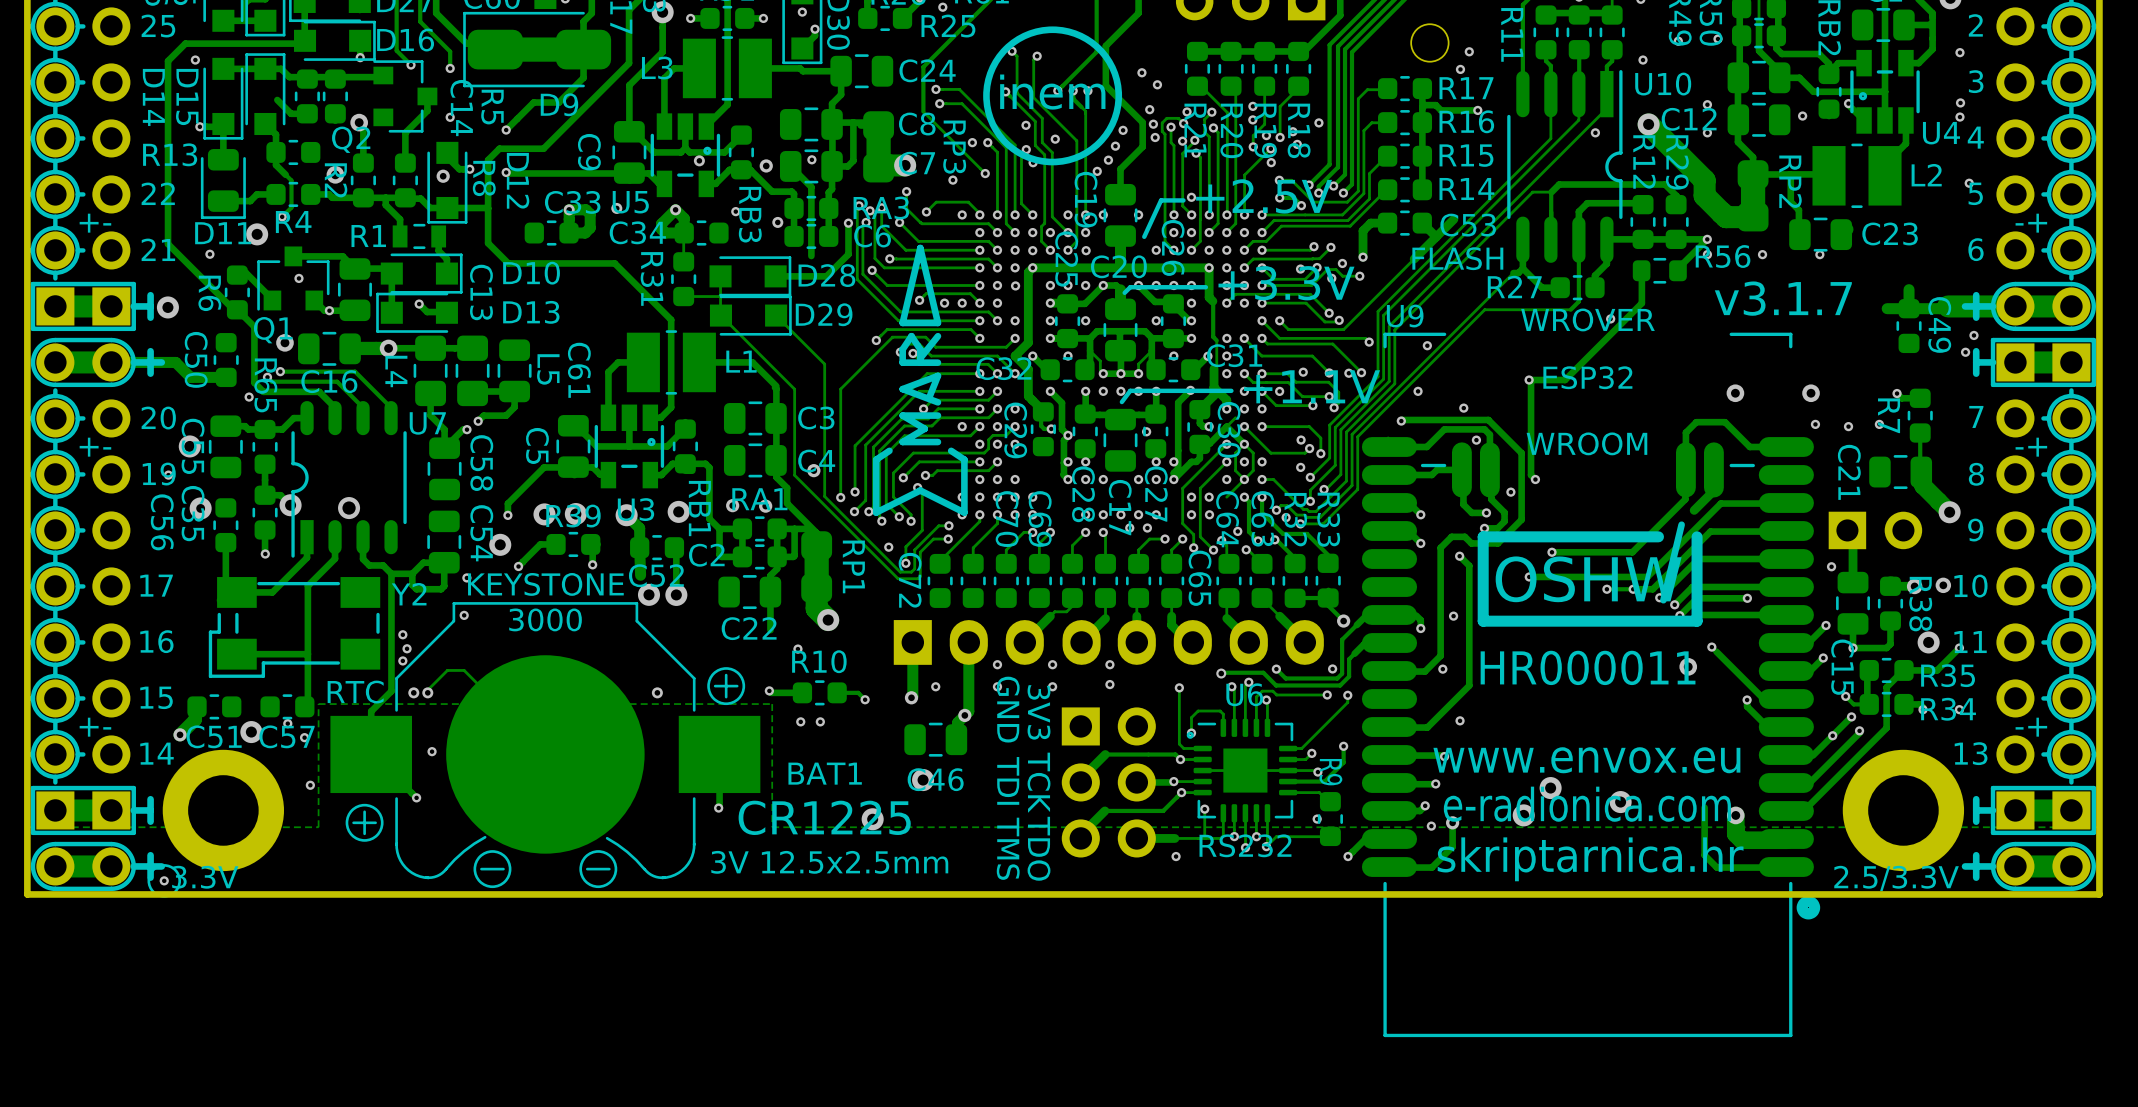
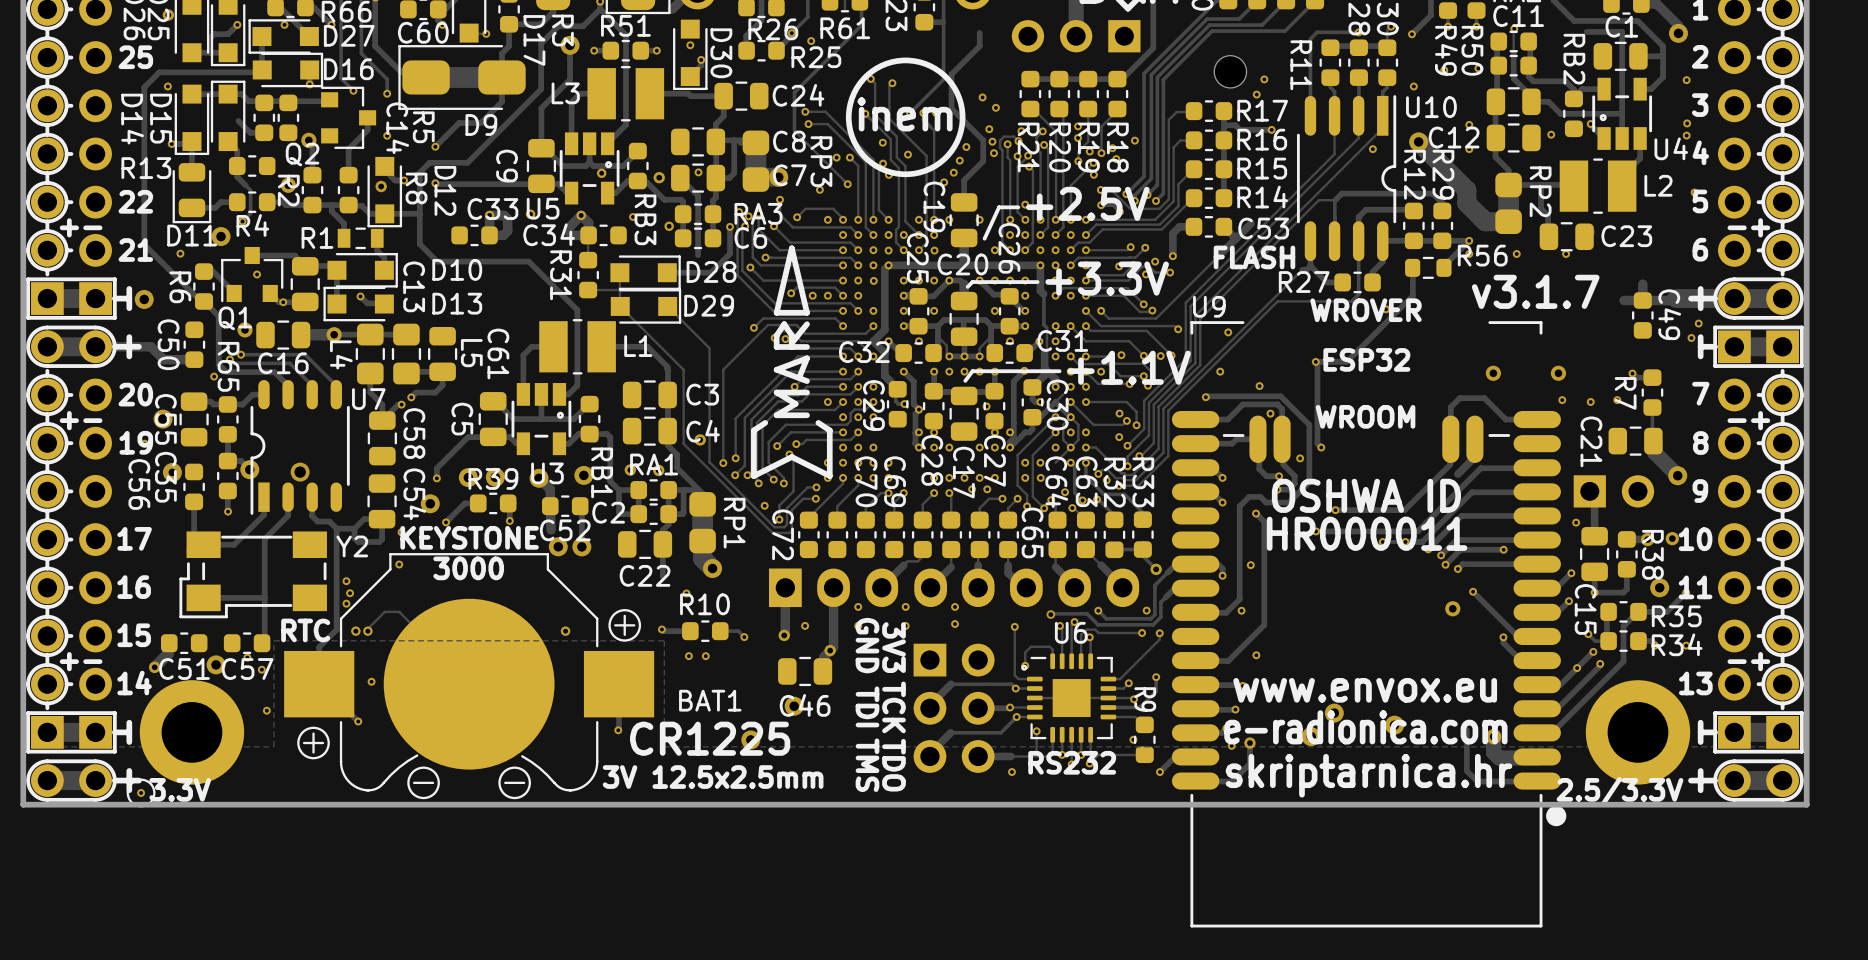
drawing: [1477, 521, 1703, 627] -> none
text: none -> OSHWA ID (1366, 495)
text position: HR000011 (1588, 667) -> HR000011 (1367, 533)

